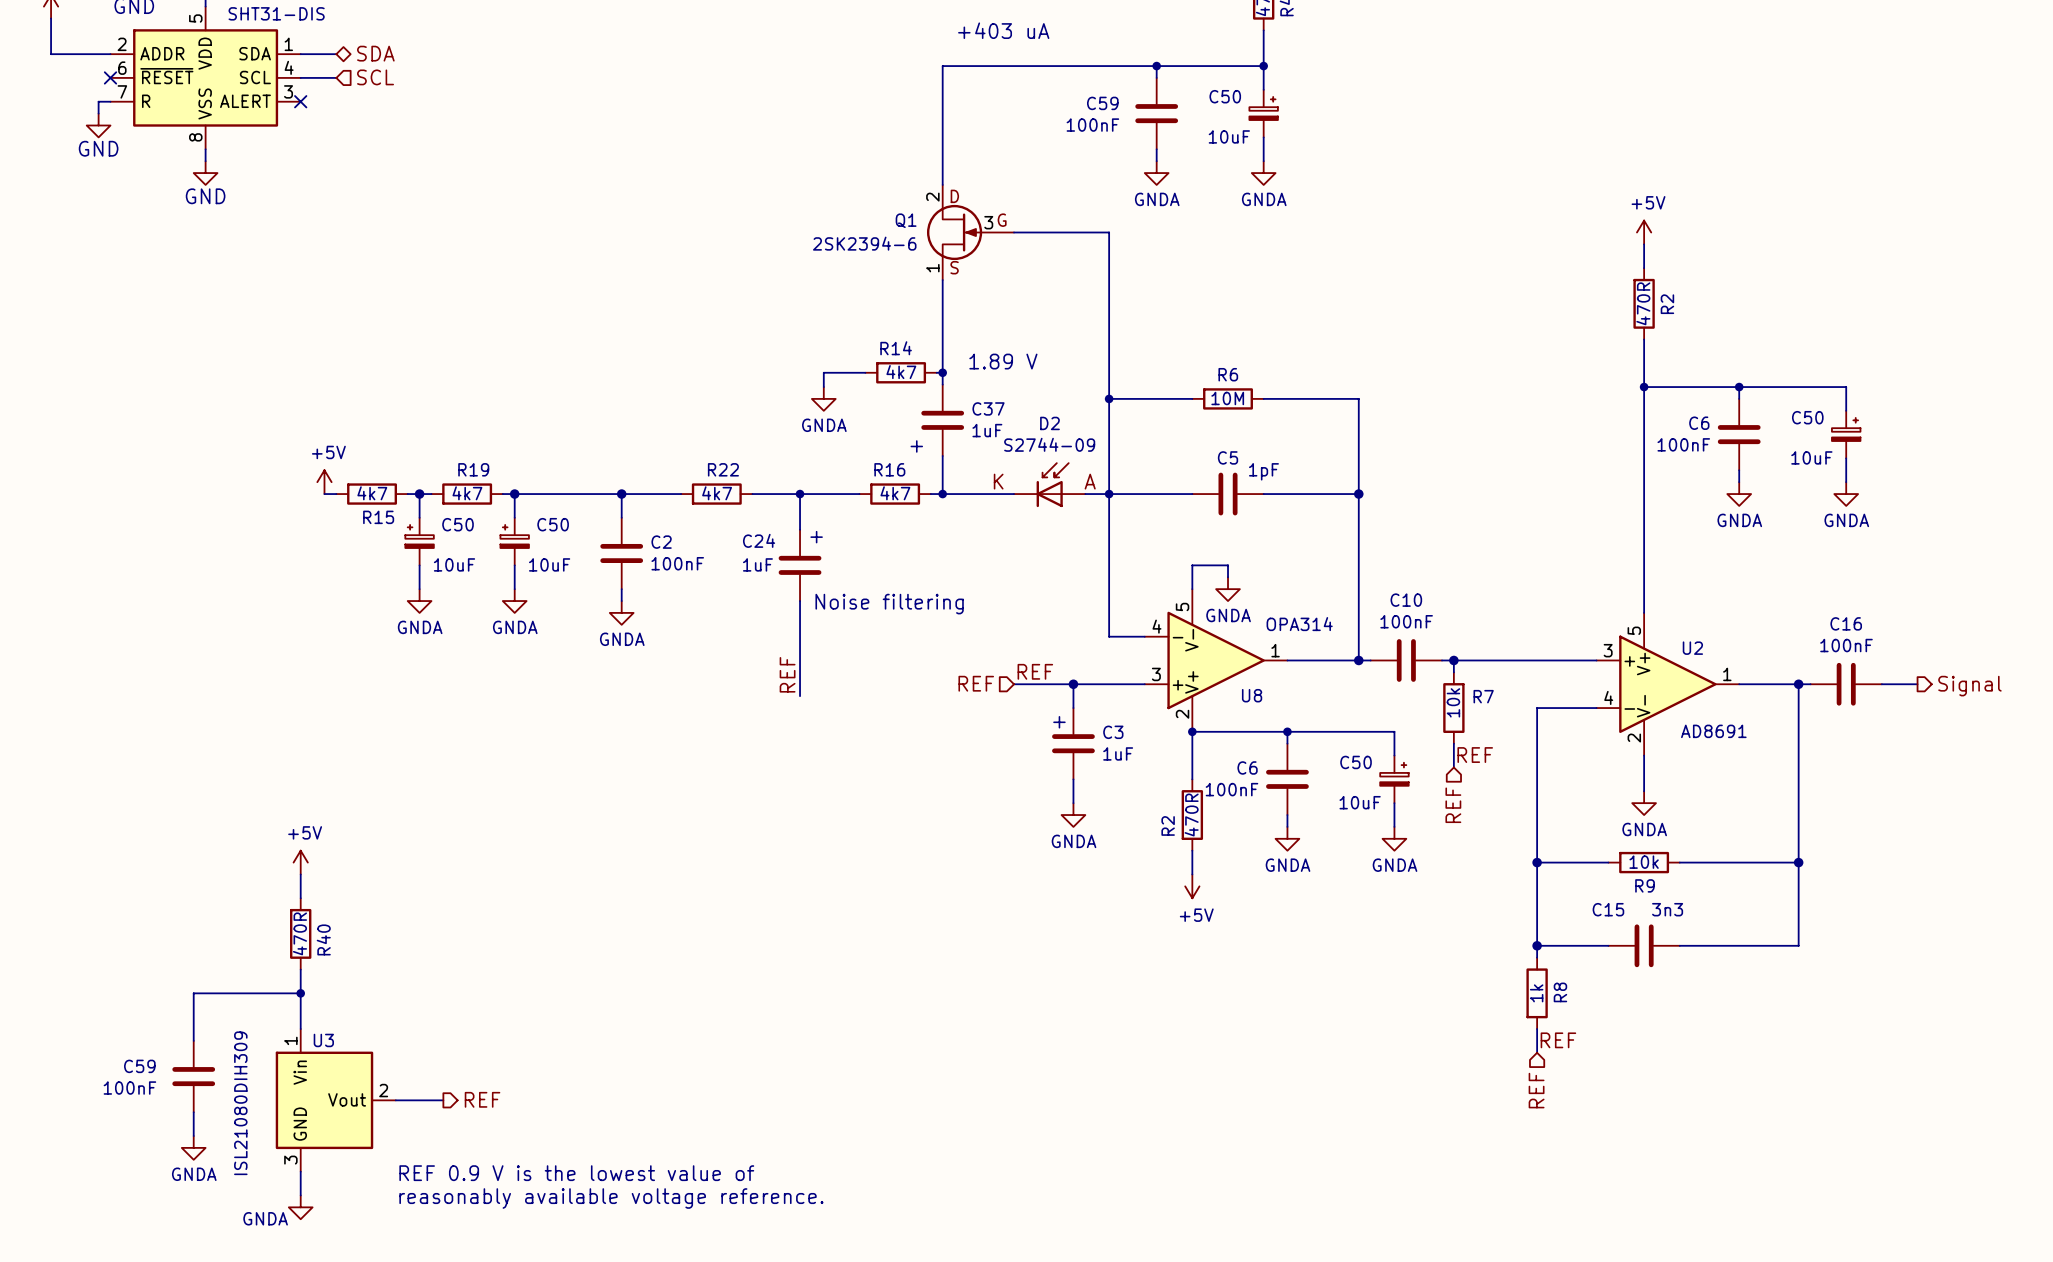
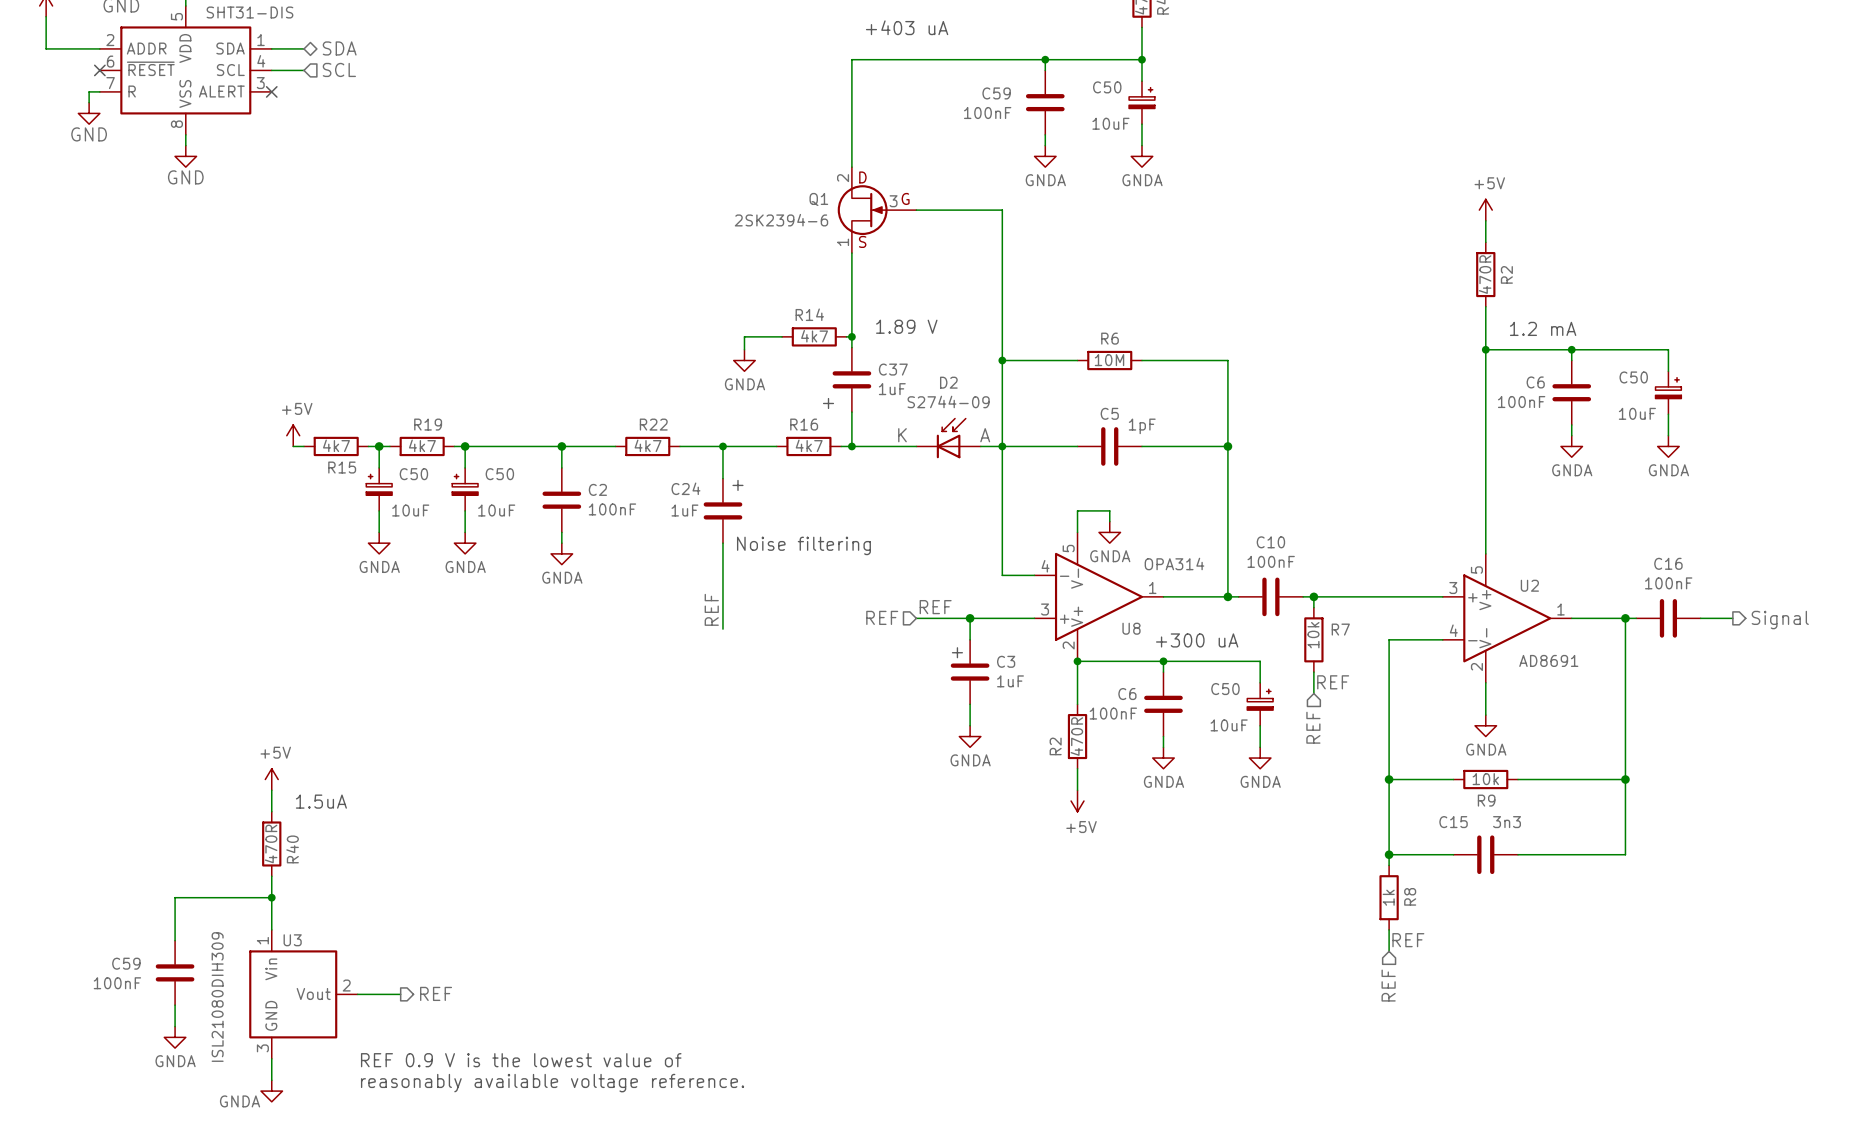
text: none -> 1.2 mA (1543, 328)
text: none -> +300 uA (1197, 640)
text: none -> 1.5uA (321, 801)

